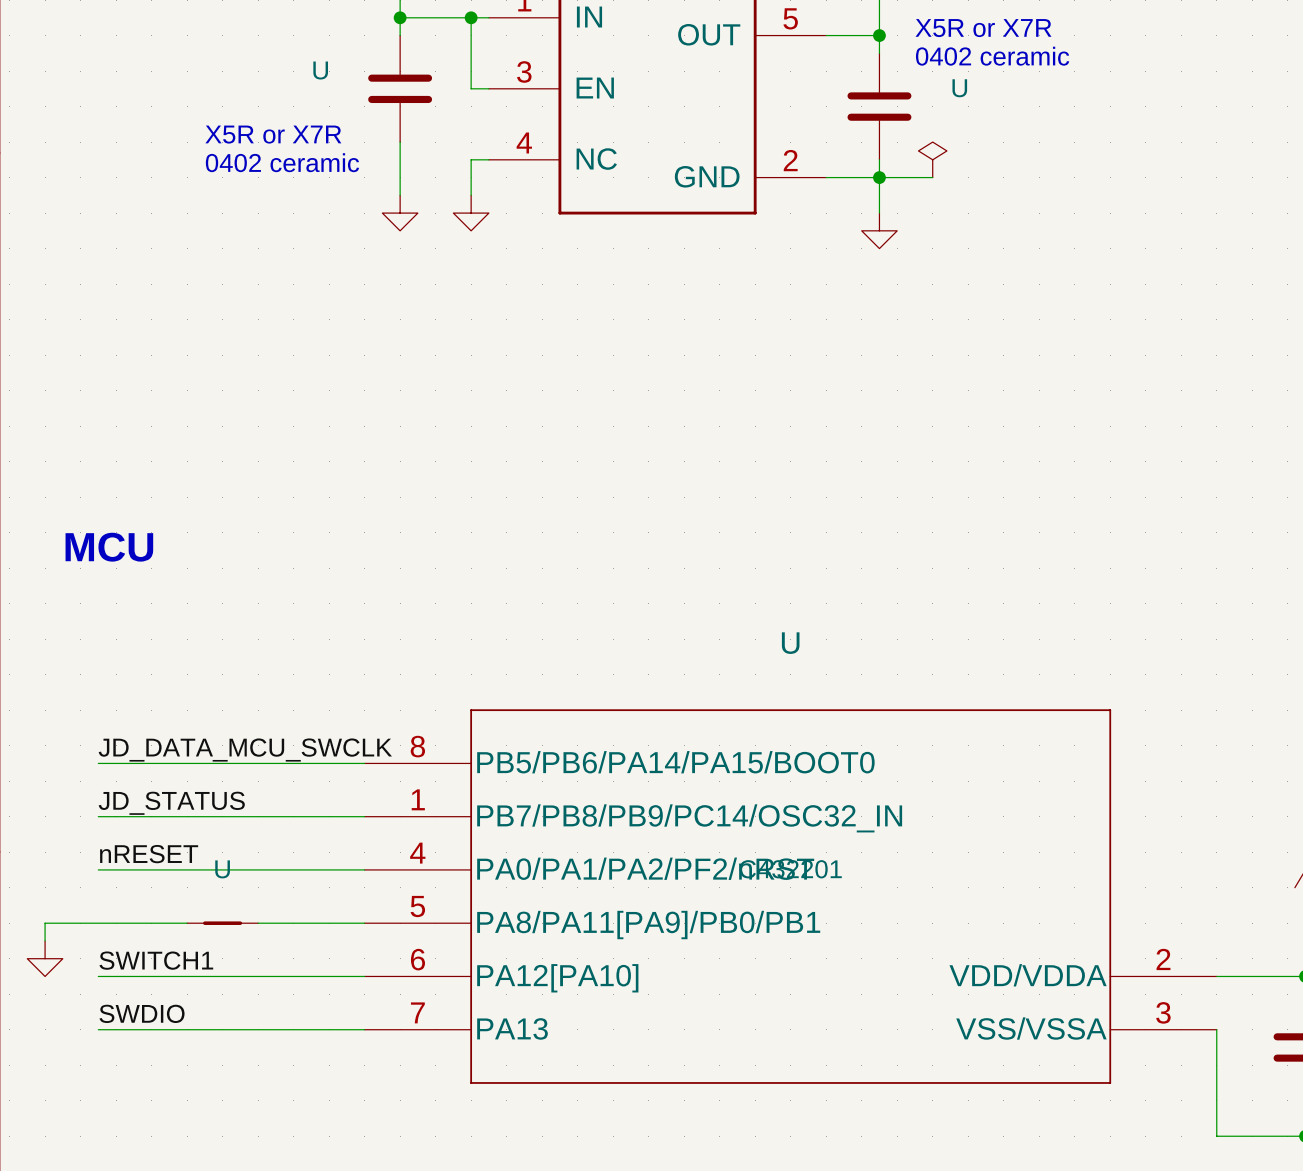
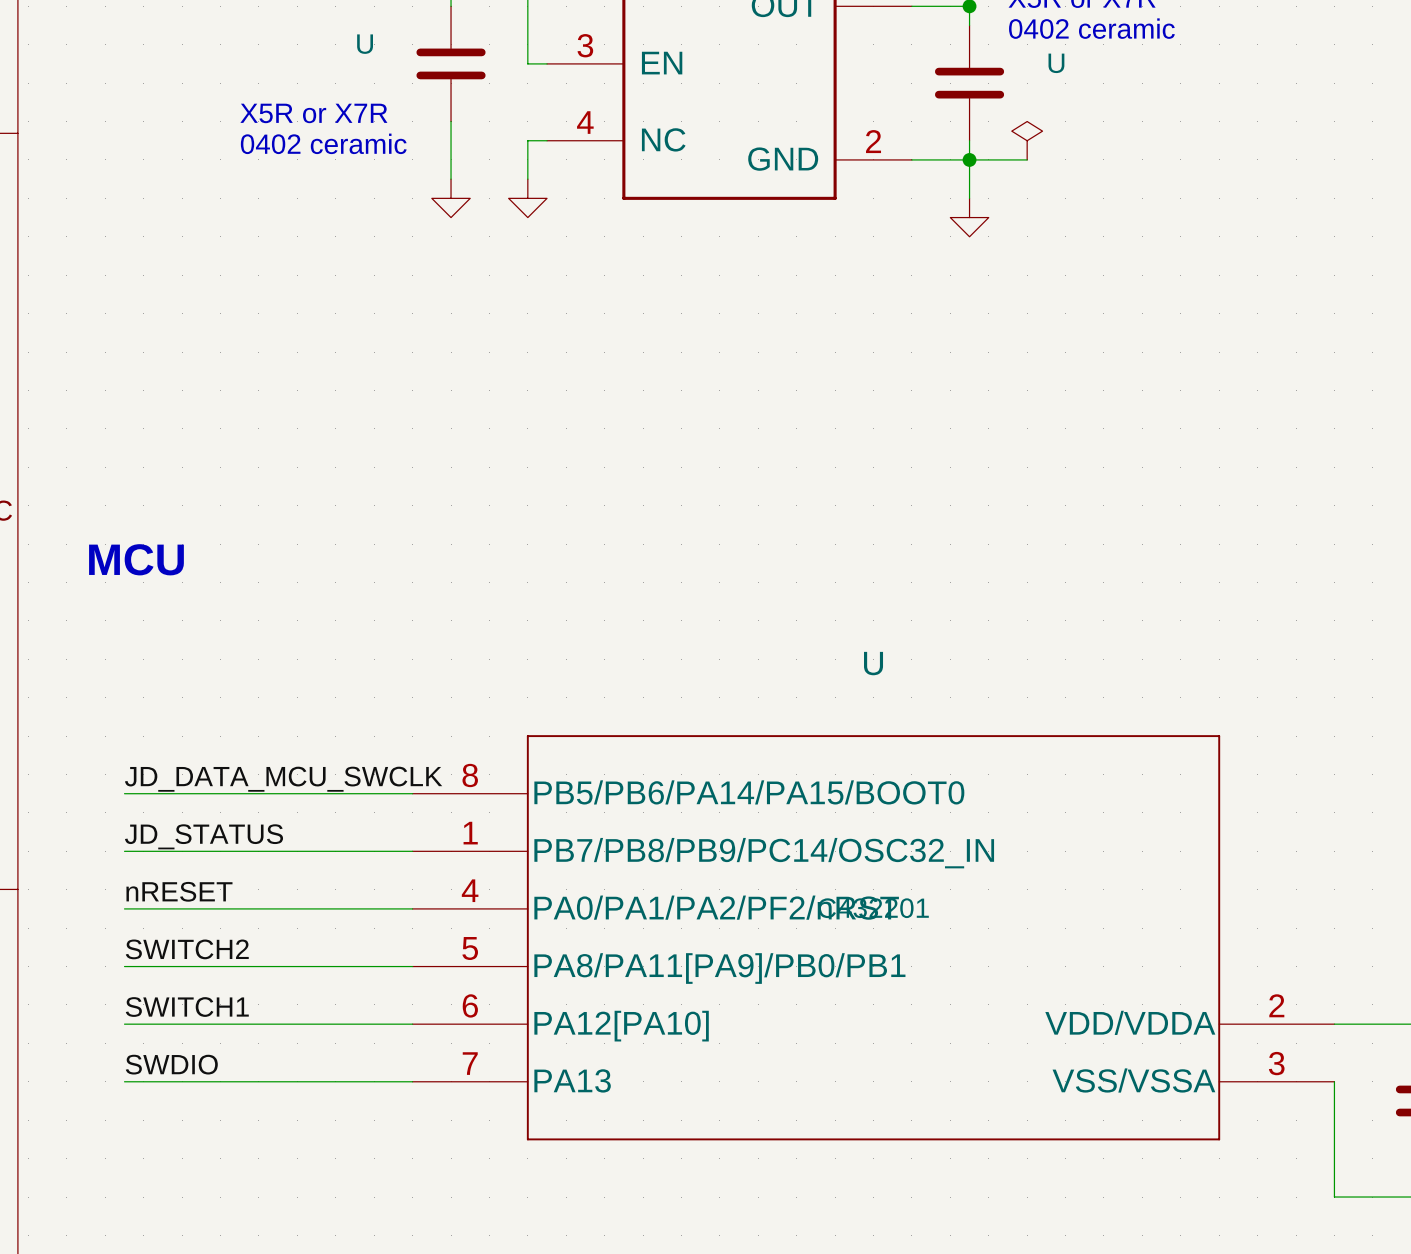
label: none -> SWITCH2 (187, 949)
wire: (98, 923) (45, 923) (45, 940) -> none
U: (222, 923) -> none
power symbol: (45, 958) -> none

